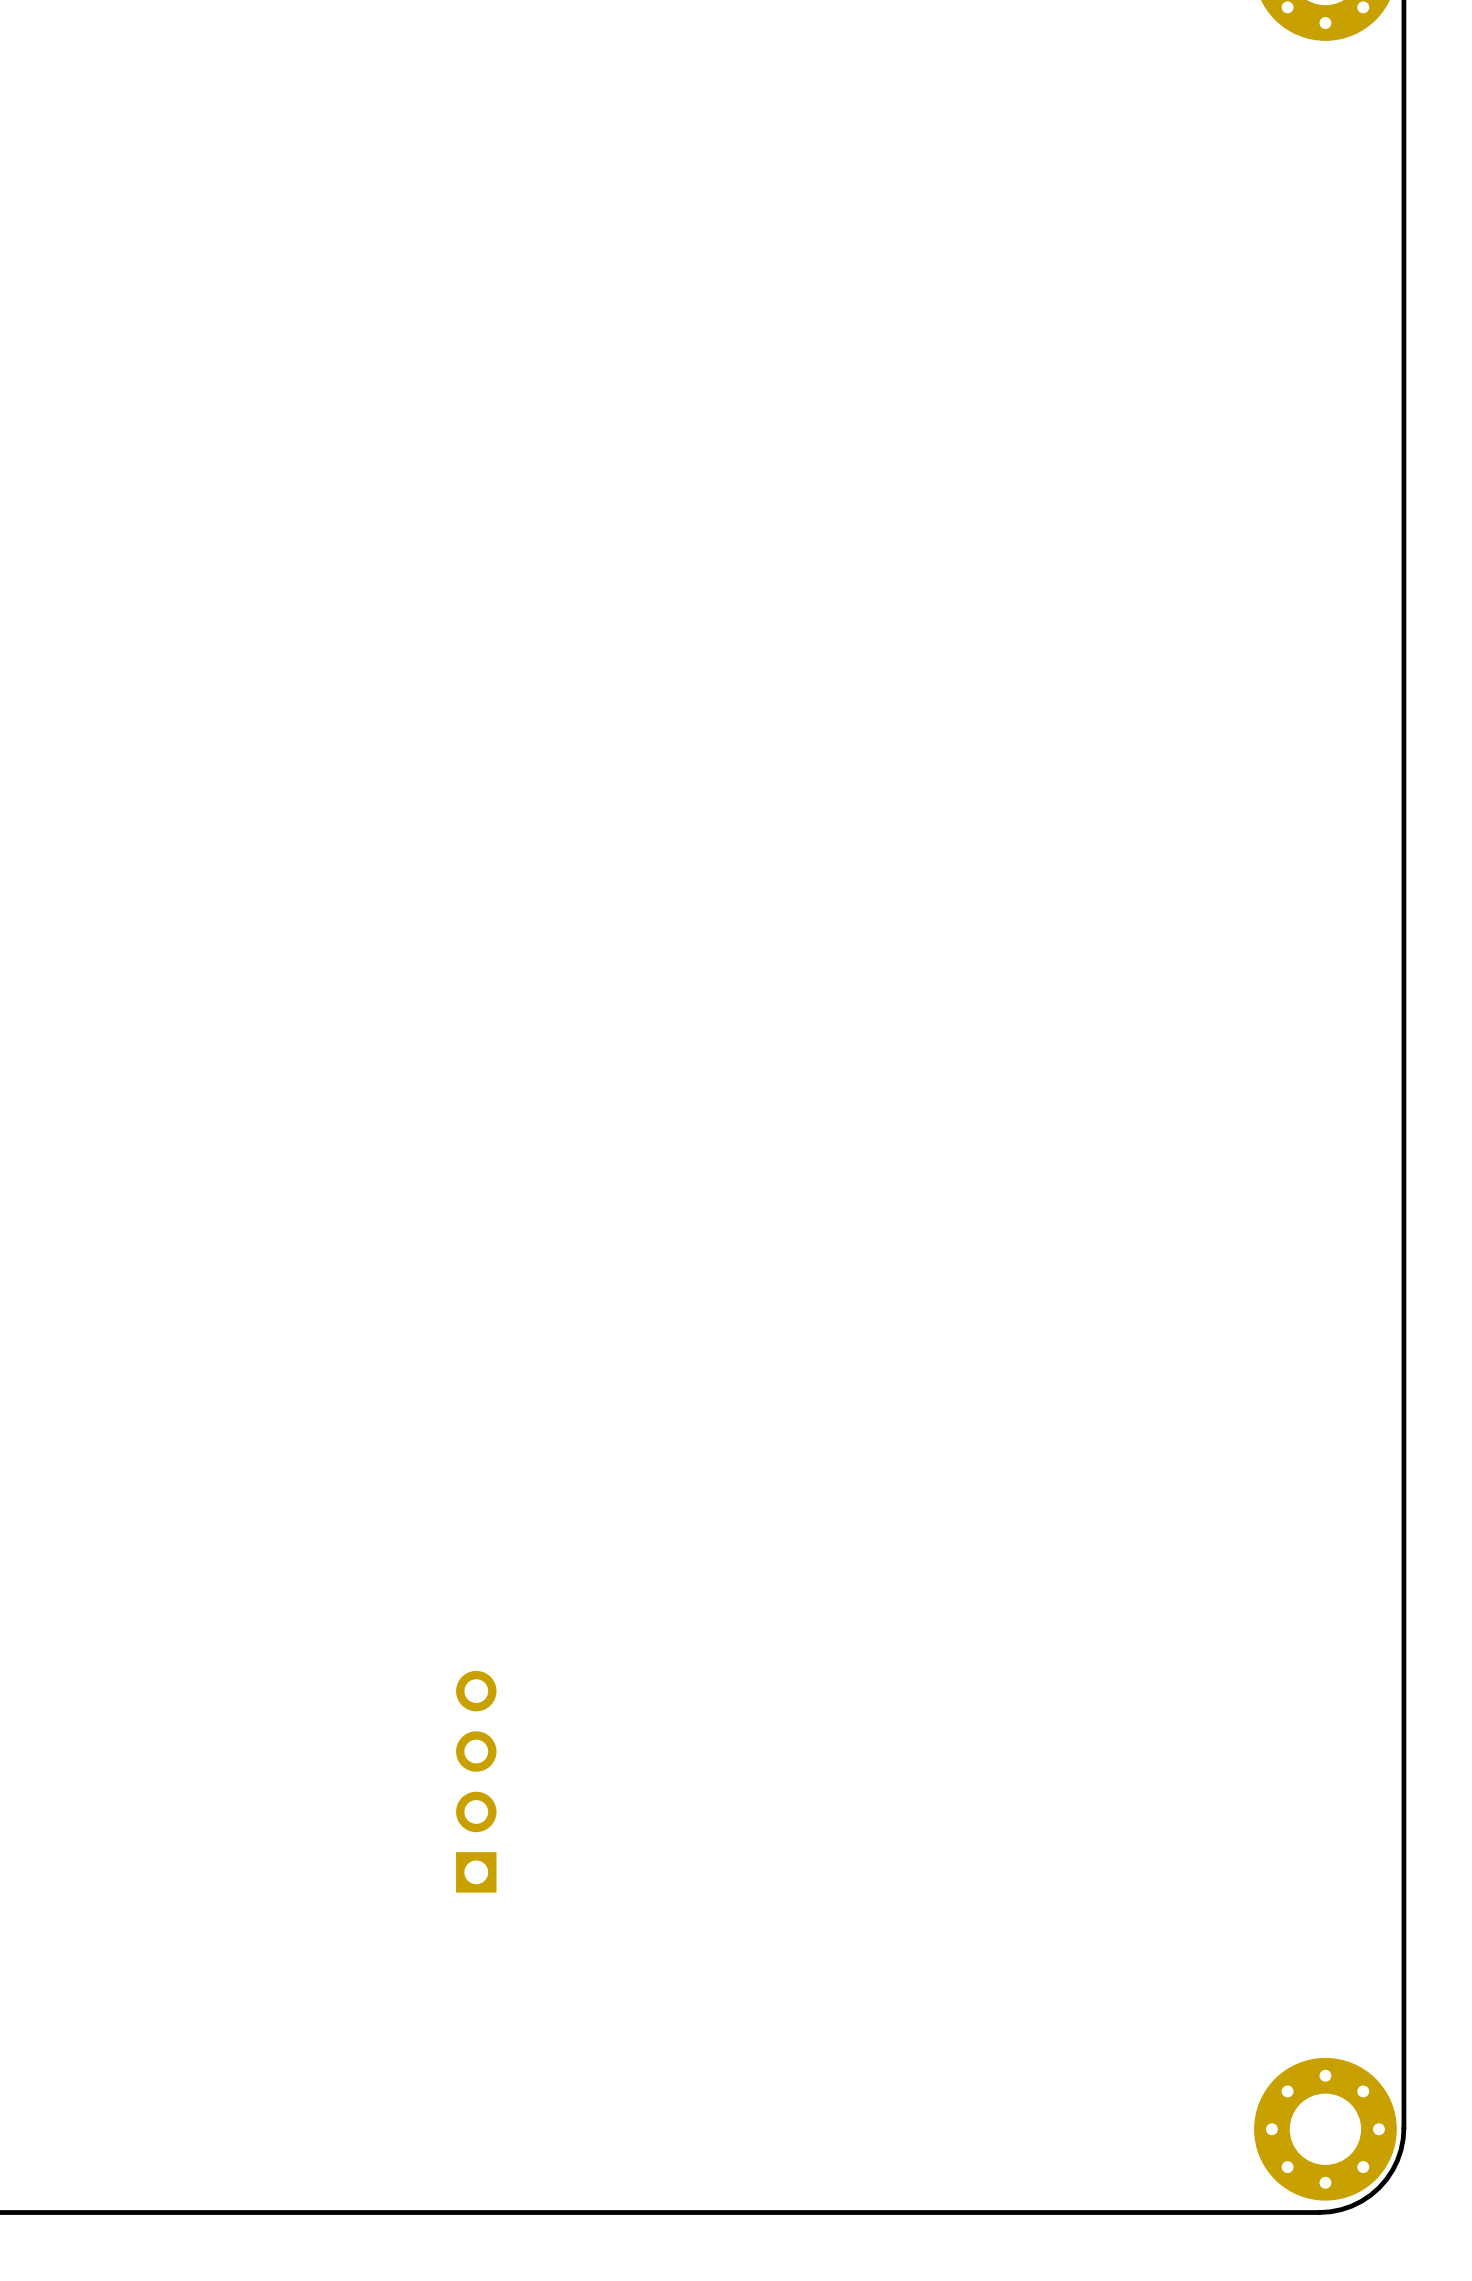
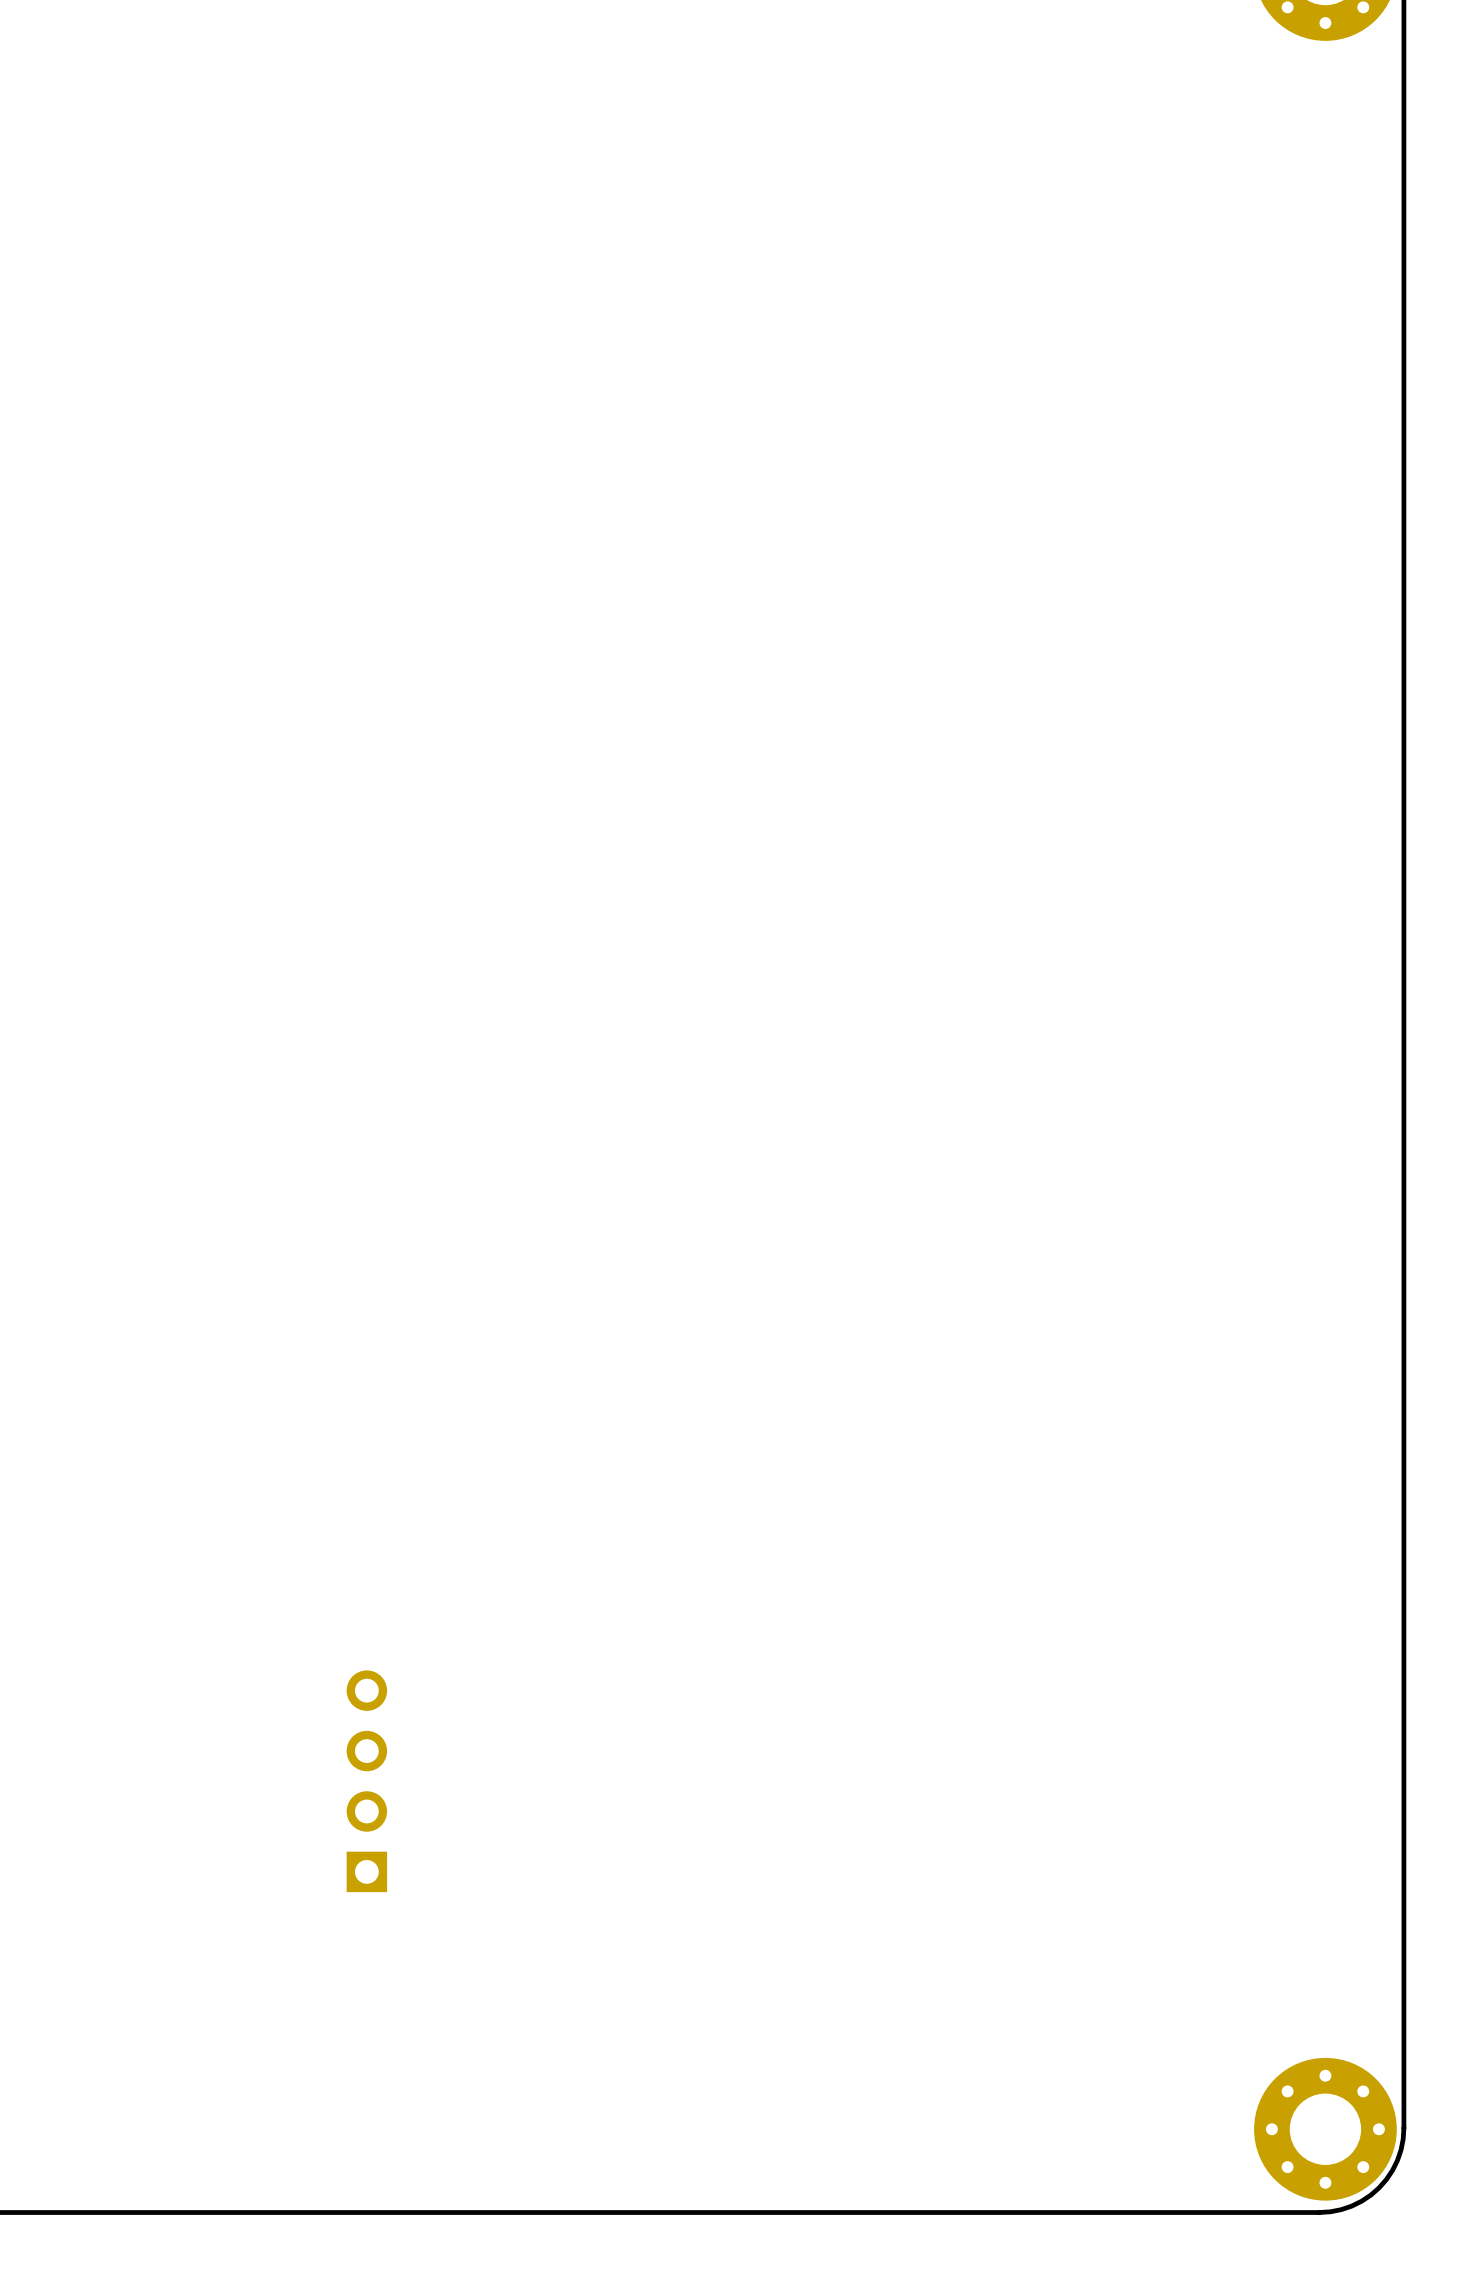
part position: (476, 1781) -> (366, 1781)

